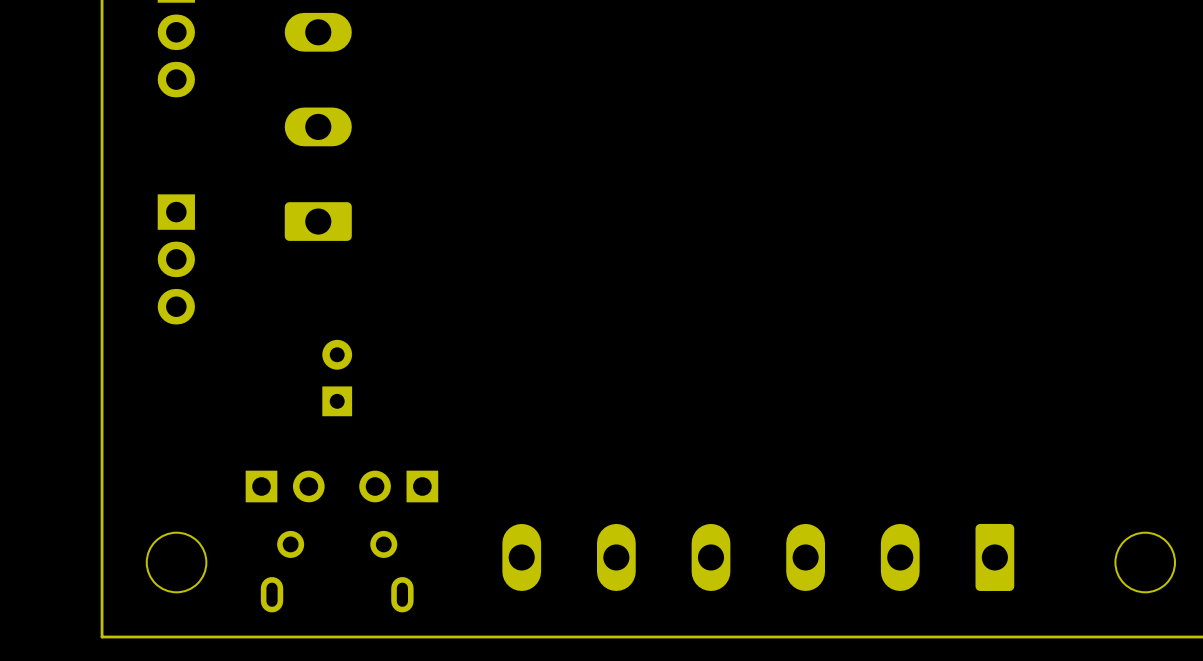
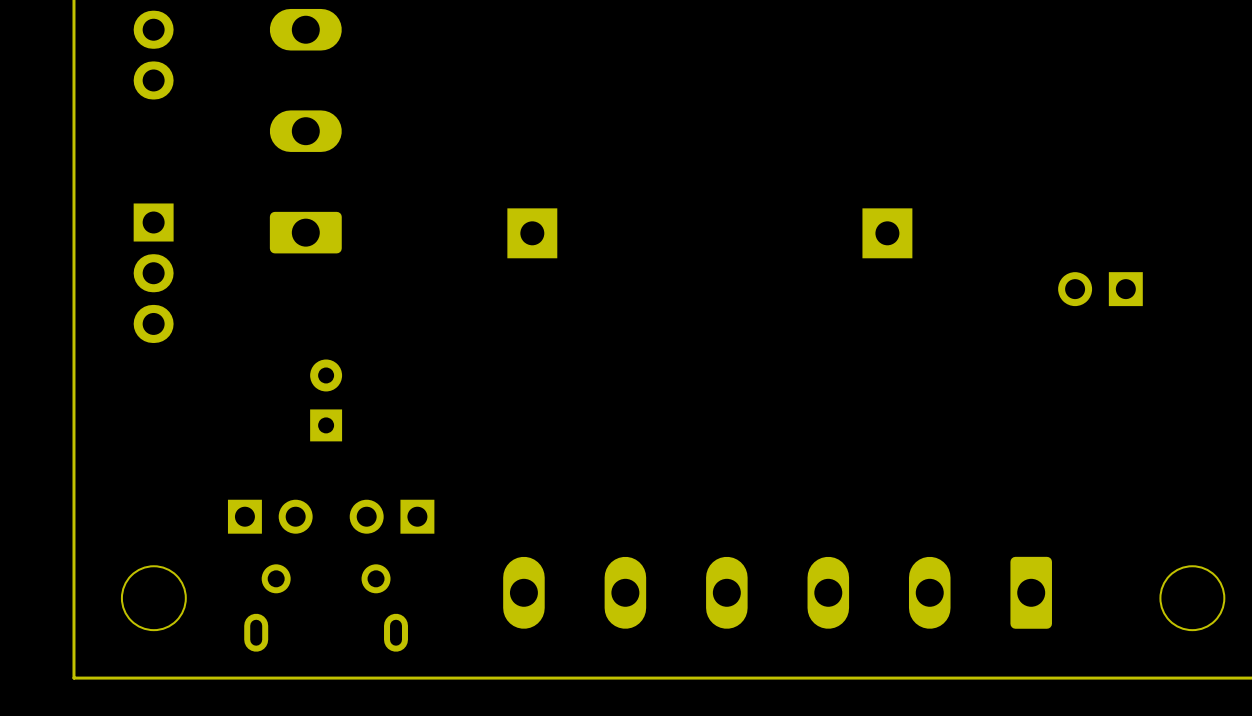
part: none -> (532, 233)
part: none -> (887, 233)
part: none -> (1100, 289)

